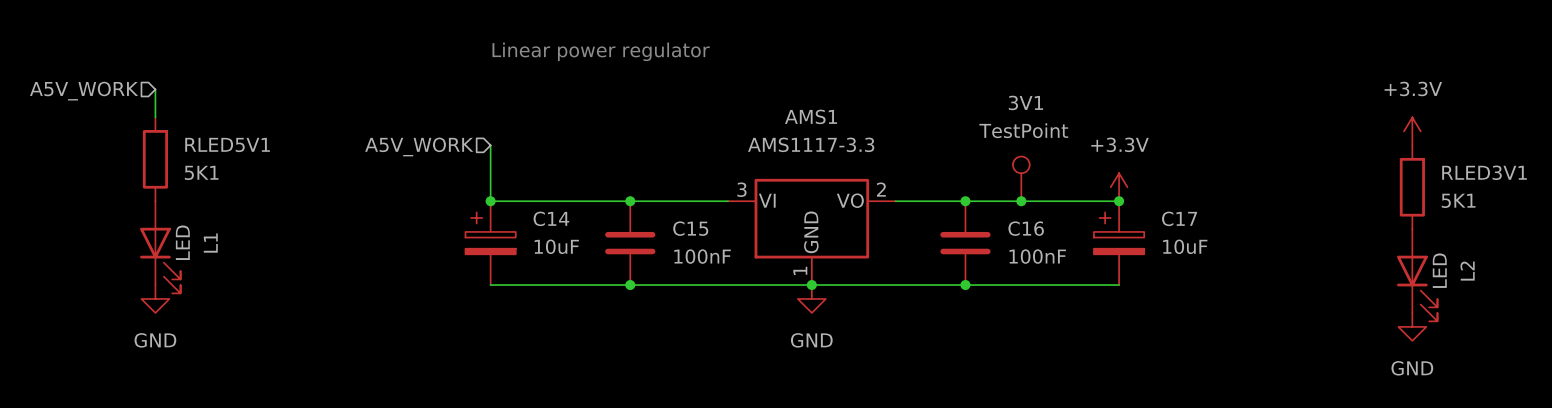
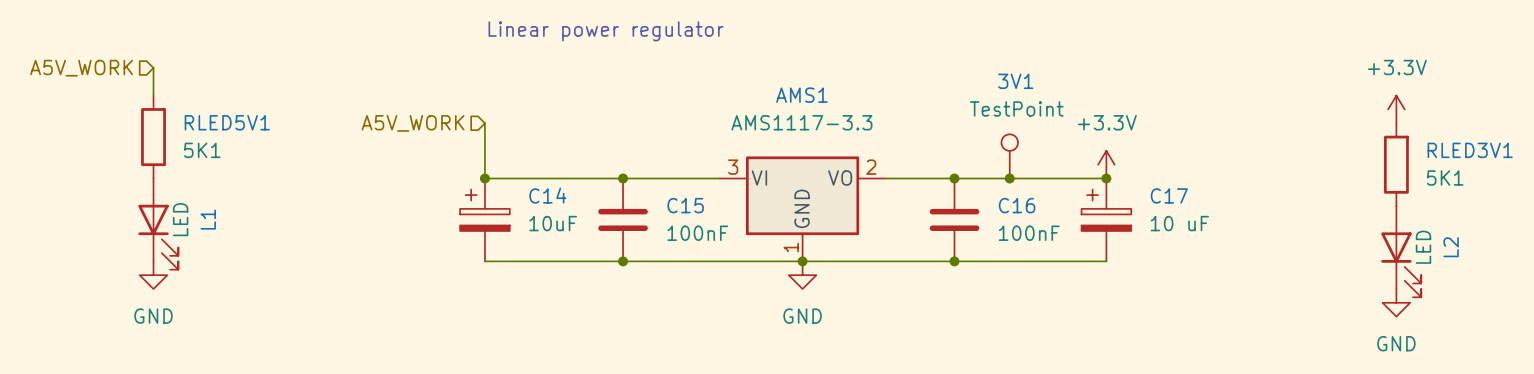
C17 value: 10uF (1185, 246) -> 10 uF (1179, 223)

